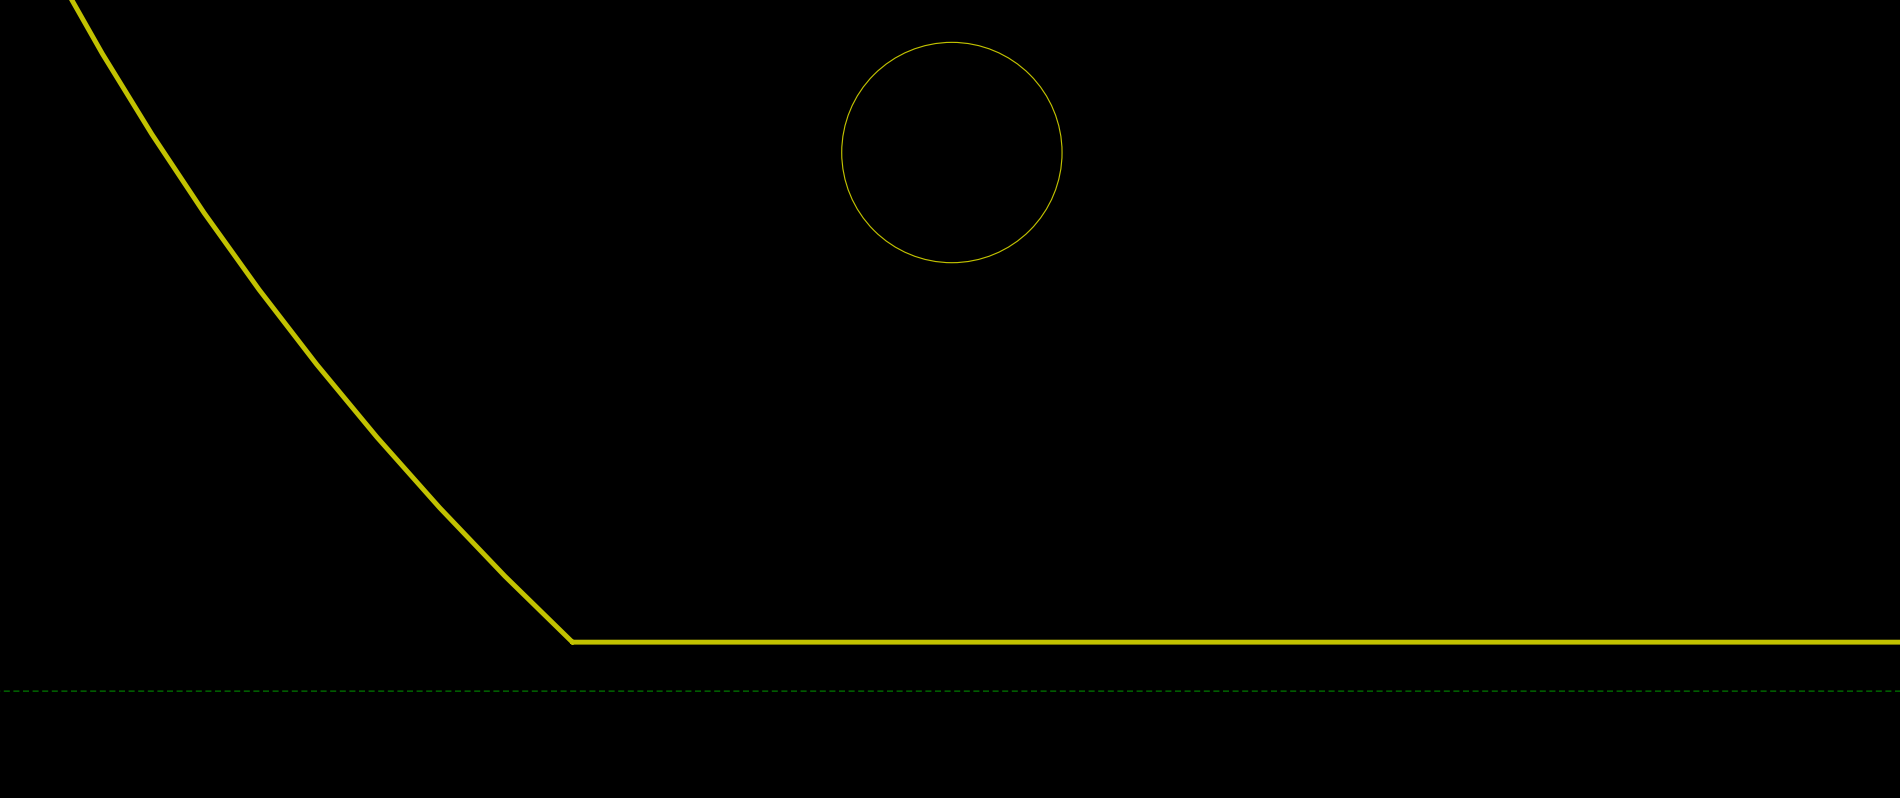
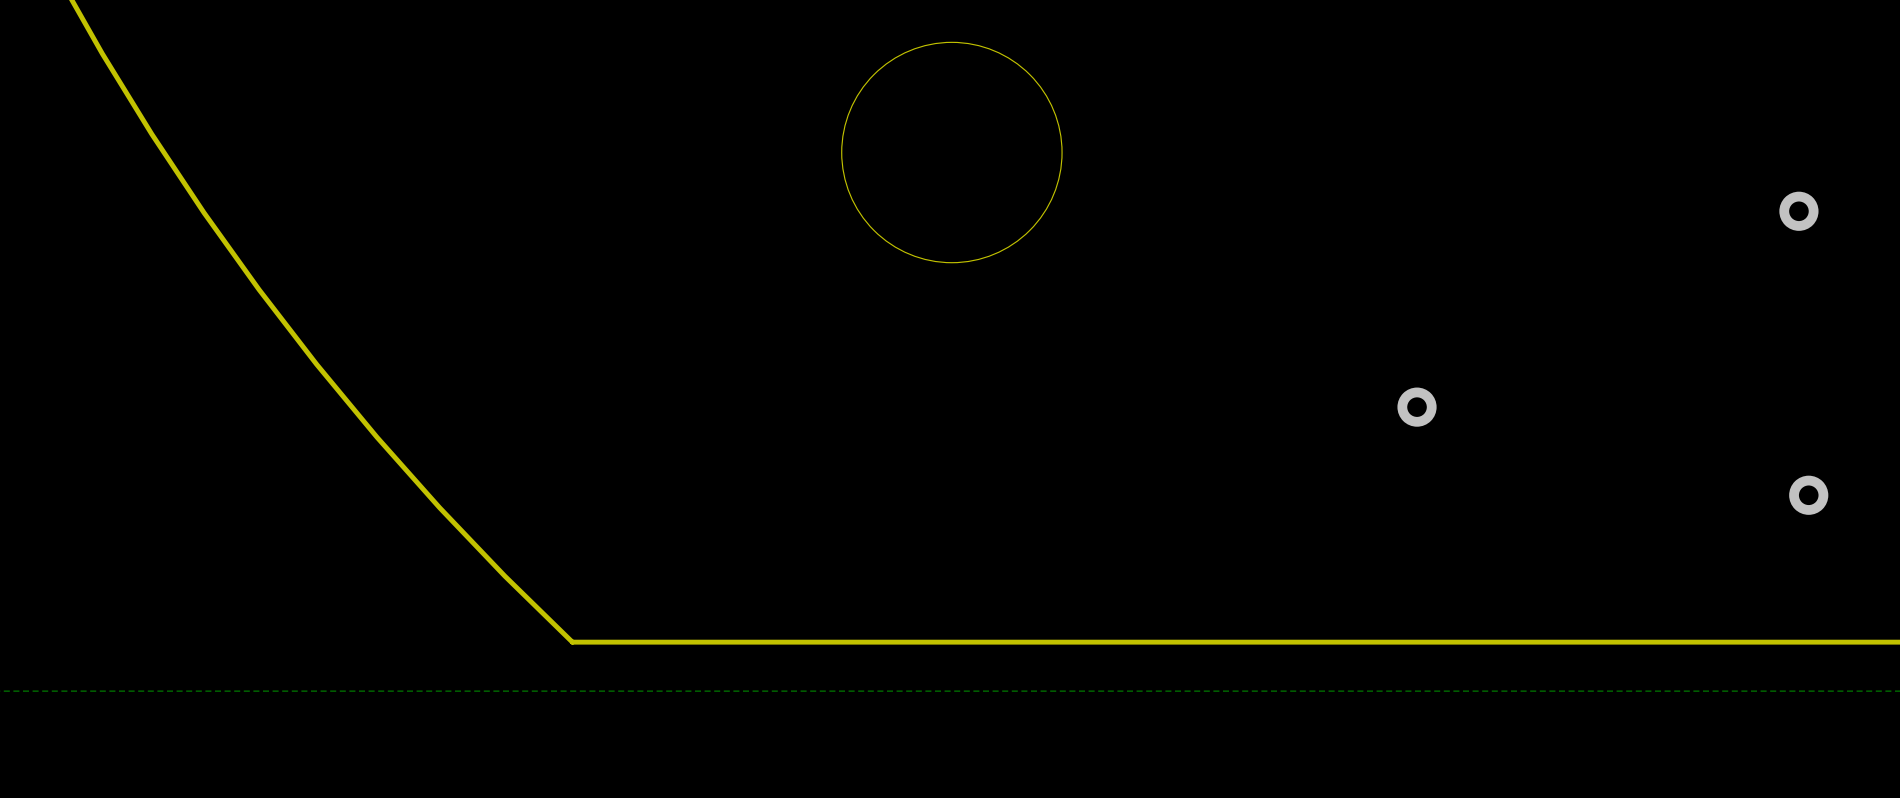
via: none -> (1798, 211)
via: none -> (1417, 407)
via: none -> (1808, 495)

